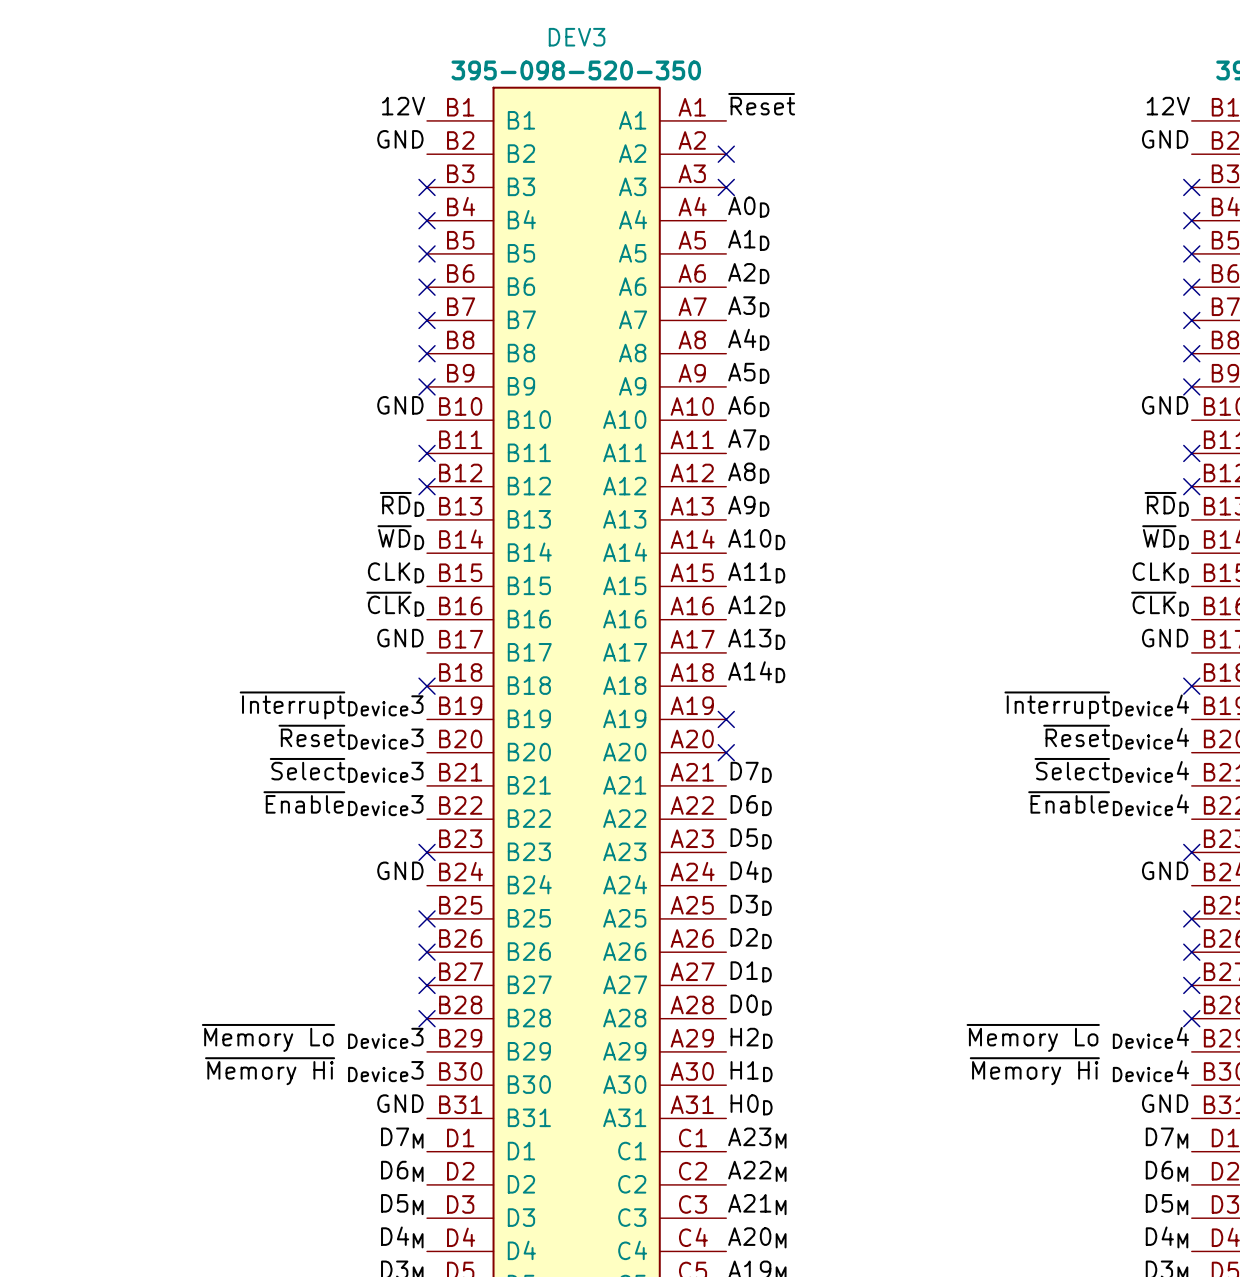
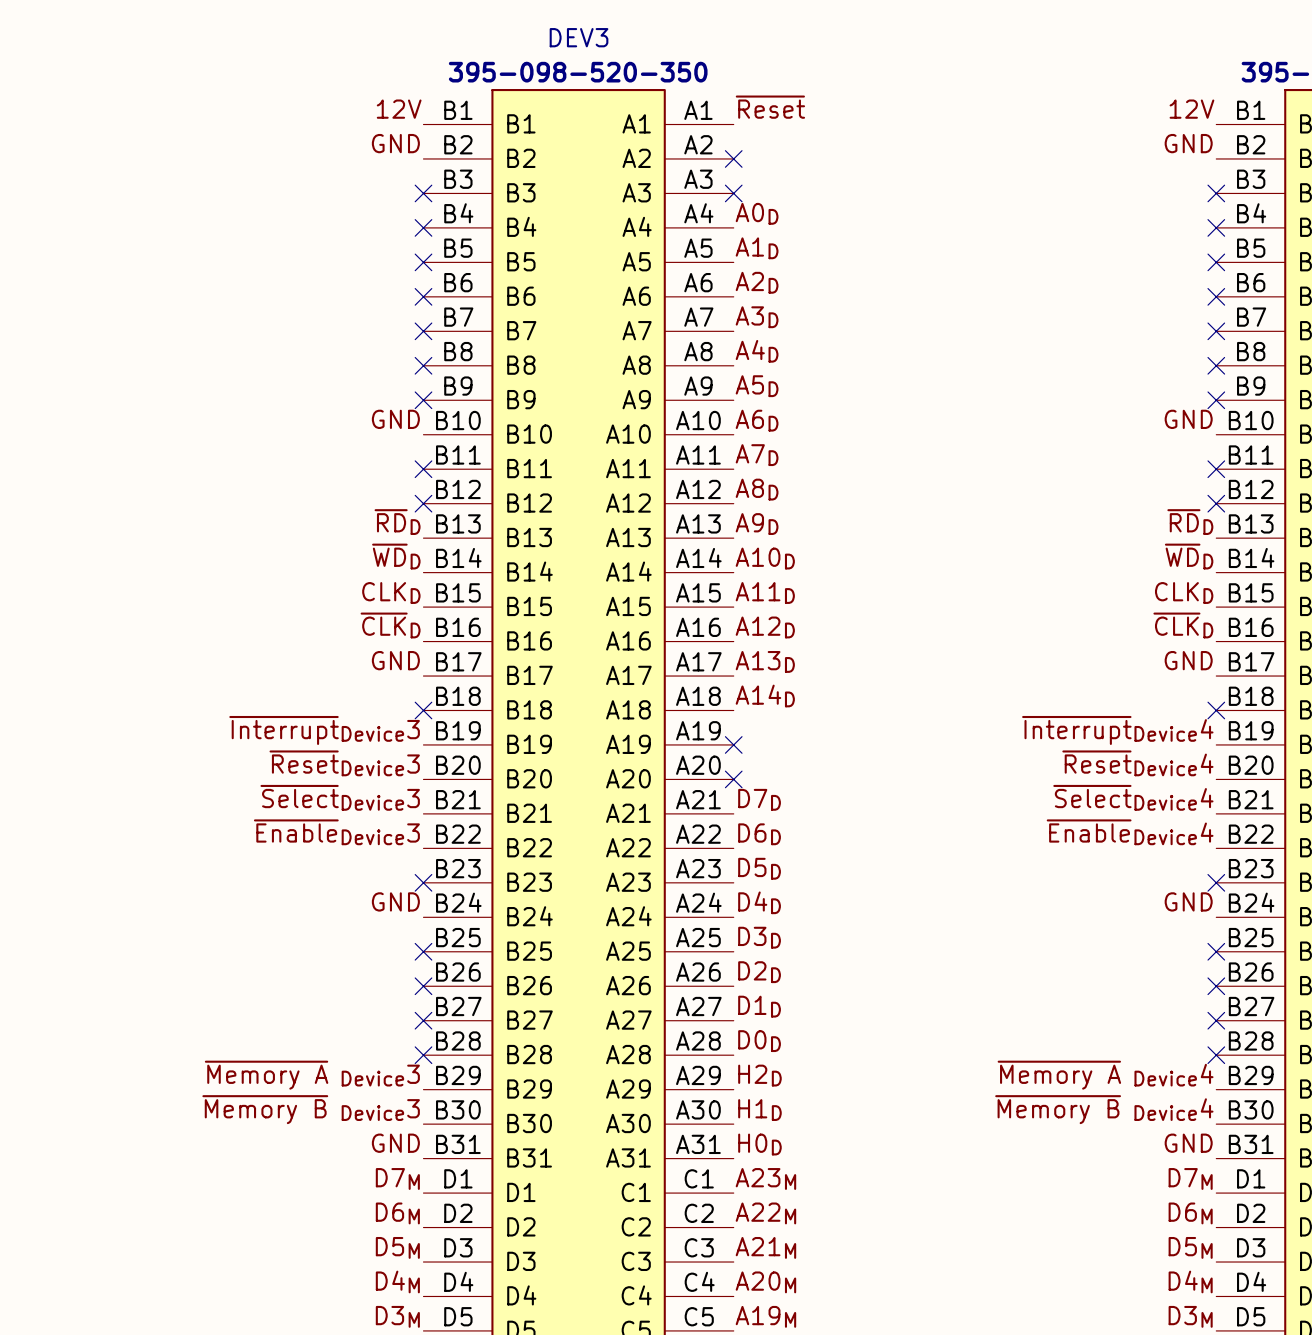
label: ~{Memory Lo} Device3 (312, 1037) -> ~{Memory A} Device3 (312, 1075)
label: ~{Memory Lo} Device4 (1077, 1037) -> ~{Memory A} Device4 (1105, 1075)
label: ~{Memory Hi} Device3 (314, 1071) -> ~{Memory B} Device3 (311, 1109)
label: ~{Memory Hi} Device4 (1079, 1071) -> ~{Memory B} Device4 (1104, 1109)

